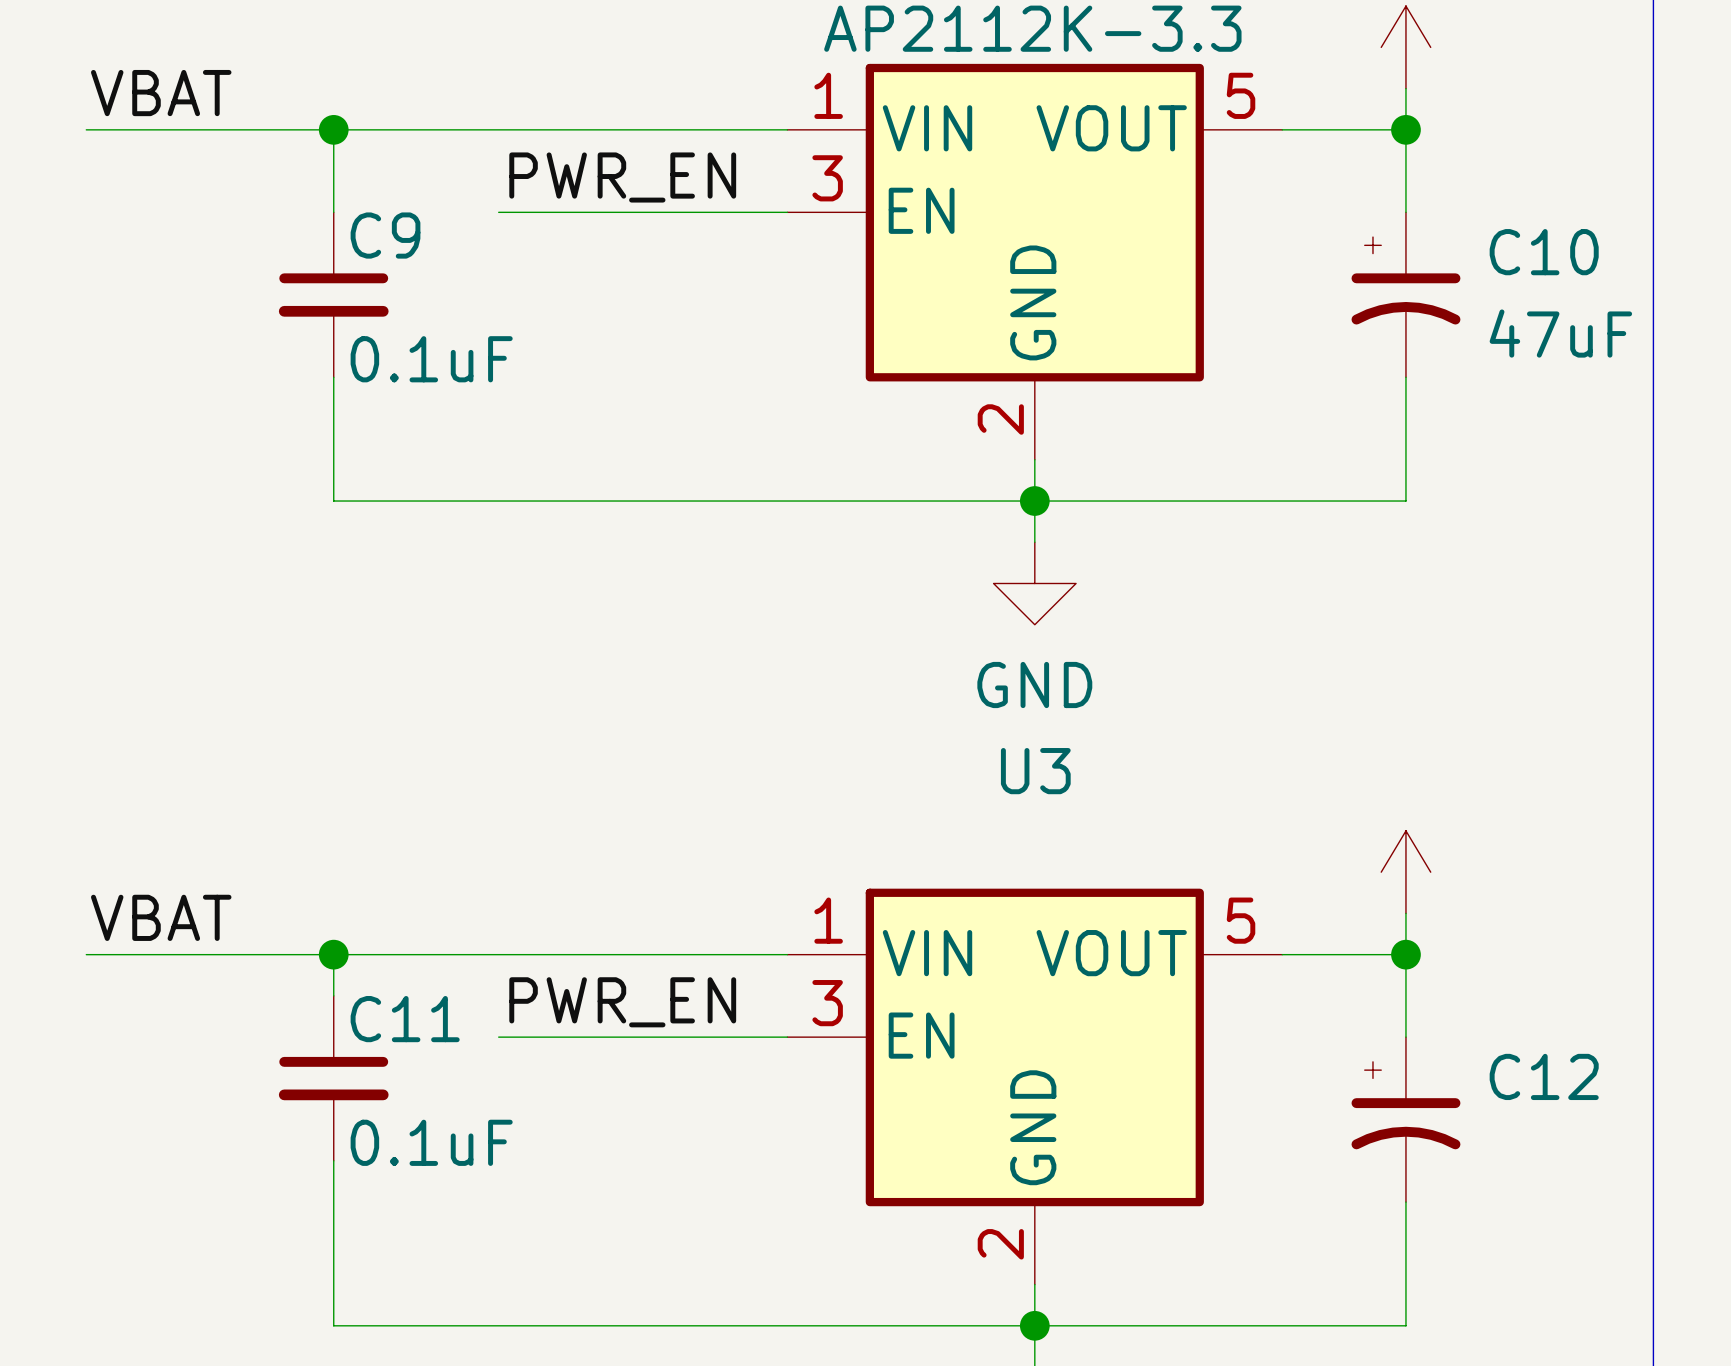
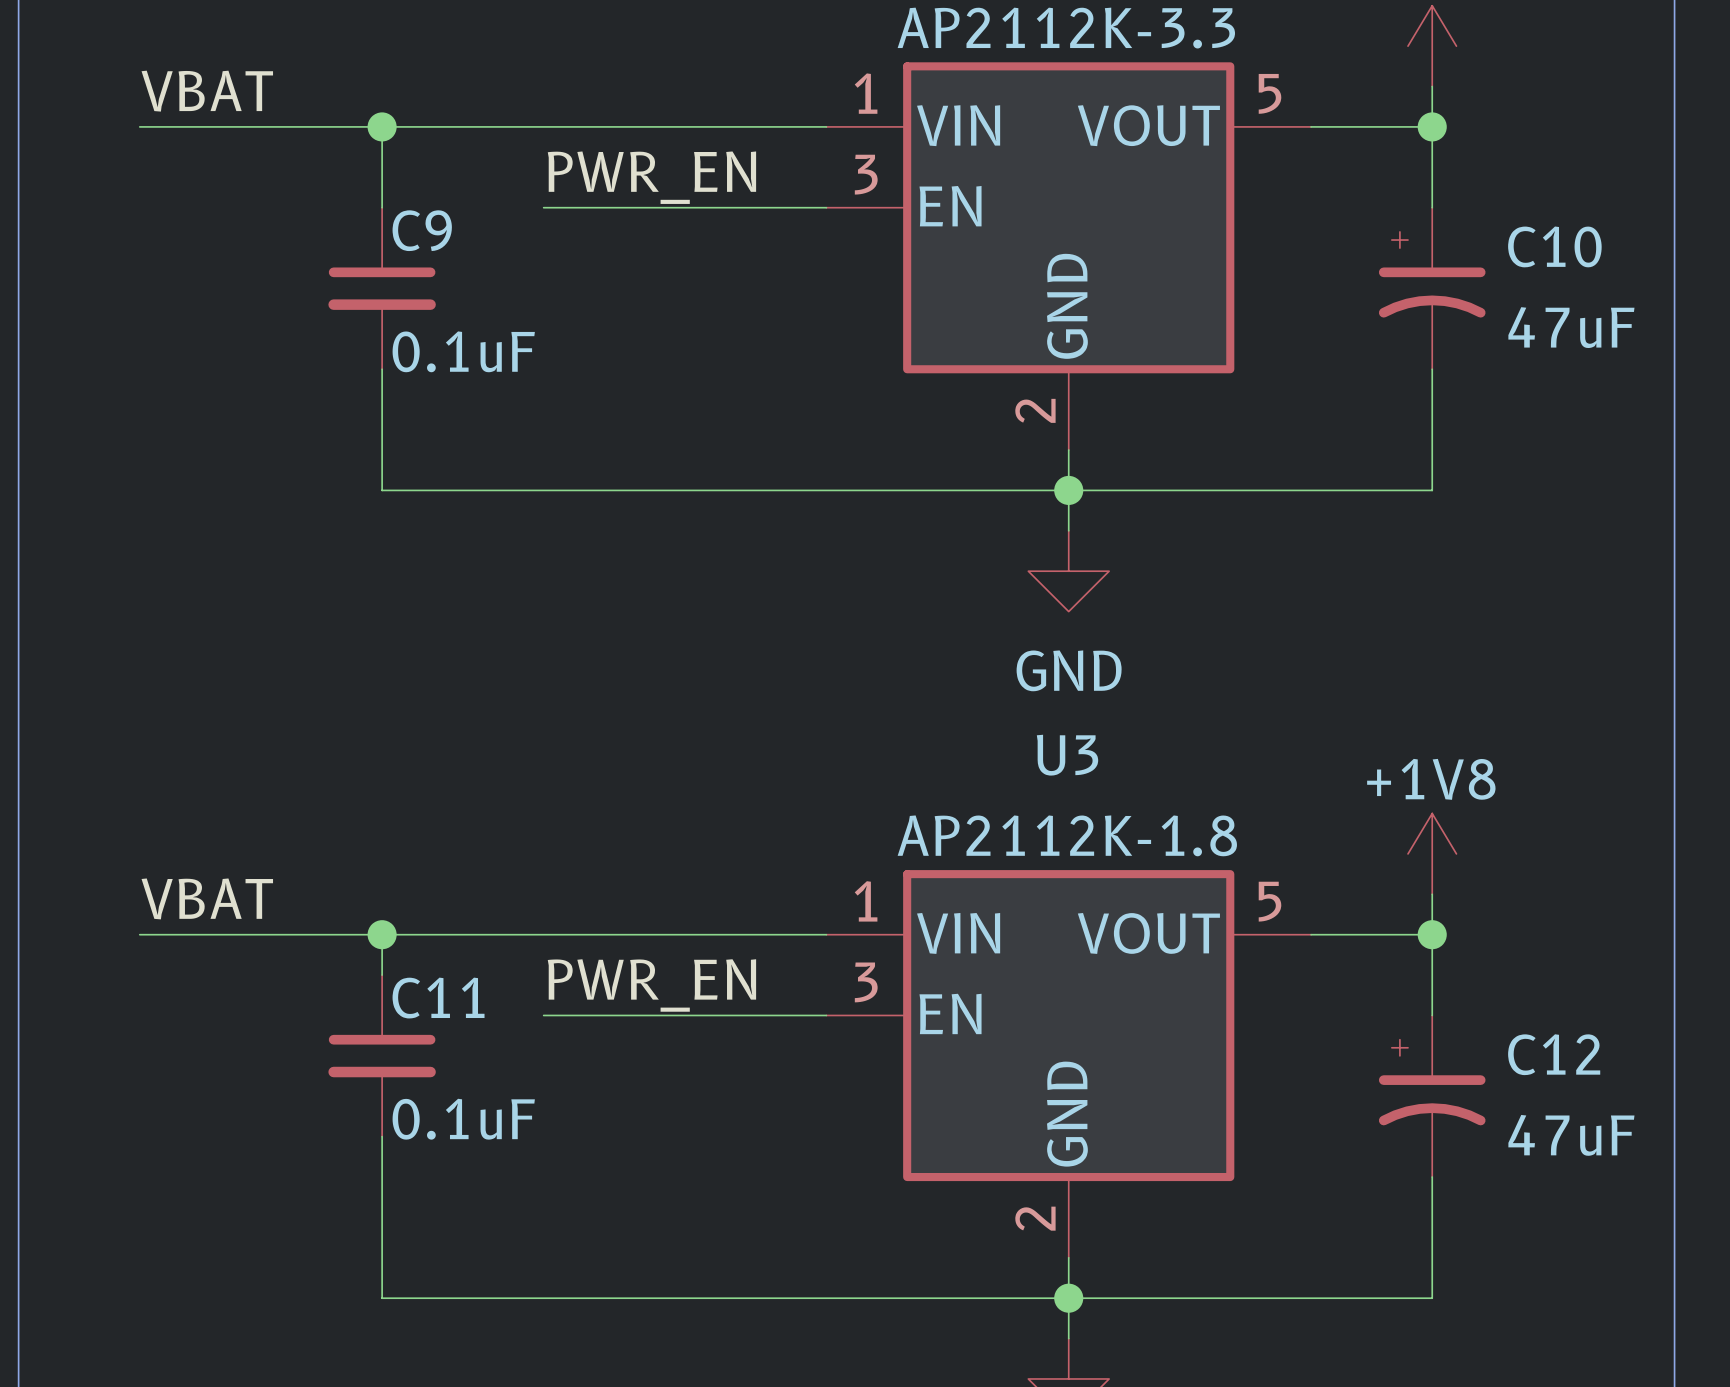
power symbol text: none -> +1V8 (1431, 779)
U3 value: none -> AP2112K-1.8 (1067, 835)
C12 value: none -> 47uF (1571, 1135)

